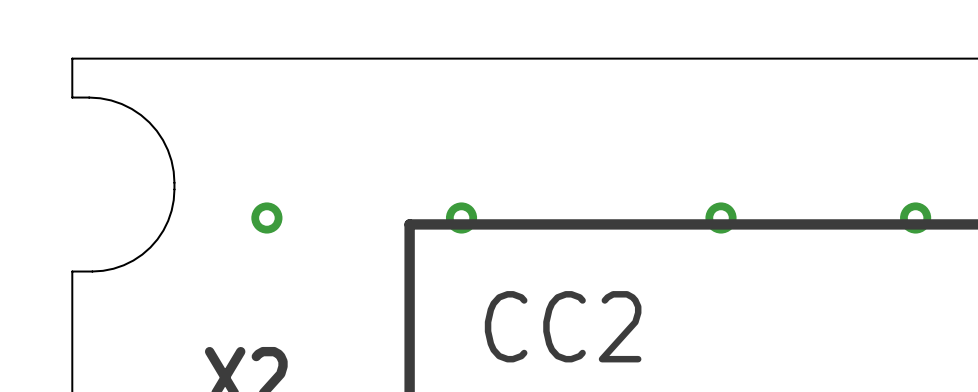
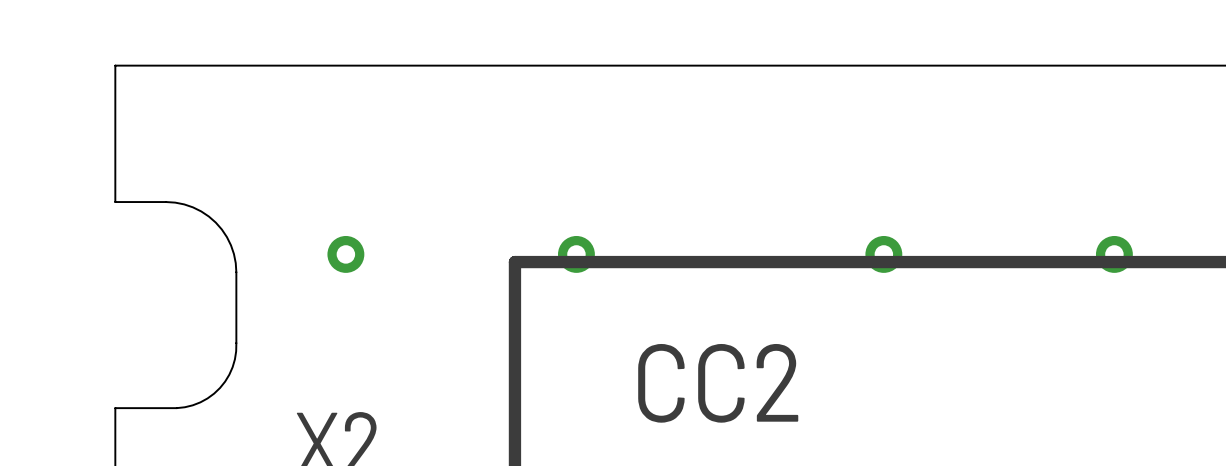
board edge: (72, 97) (111, 100) (141, 115) (163, 140) (171, 160) (174, 182) (173, 200) (168, 220) (157, 239) (142, 254) (113, 268) (72, 271) (72, 347) -> (115, 111) (115, 202) (175, 202) (201, 211) (215, 222) (226, 237) (233, 254) (236, 272) (236, 351) (229, 374) (220, 387) (207, 398) (184, 407) (115, 408)

